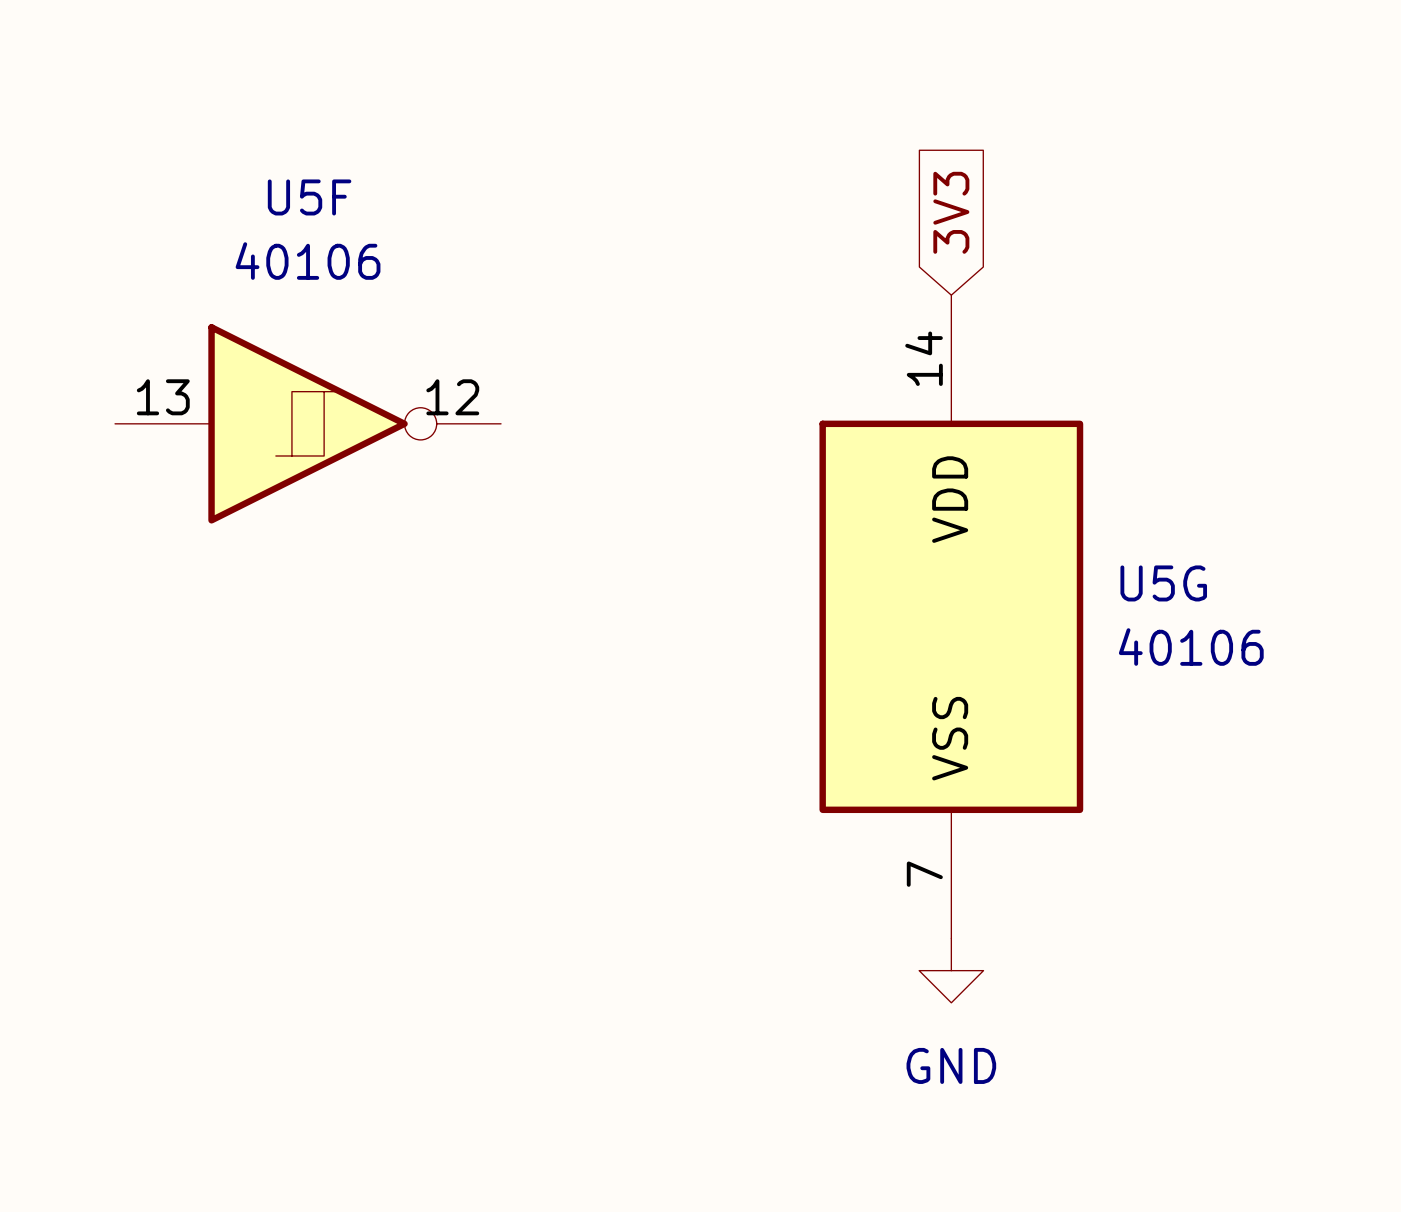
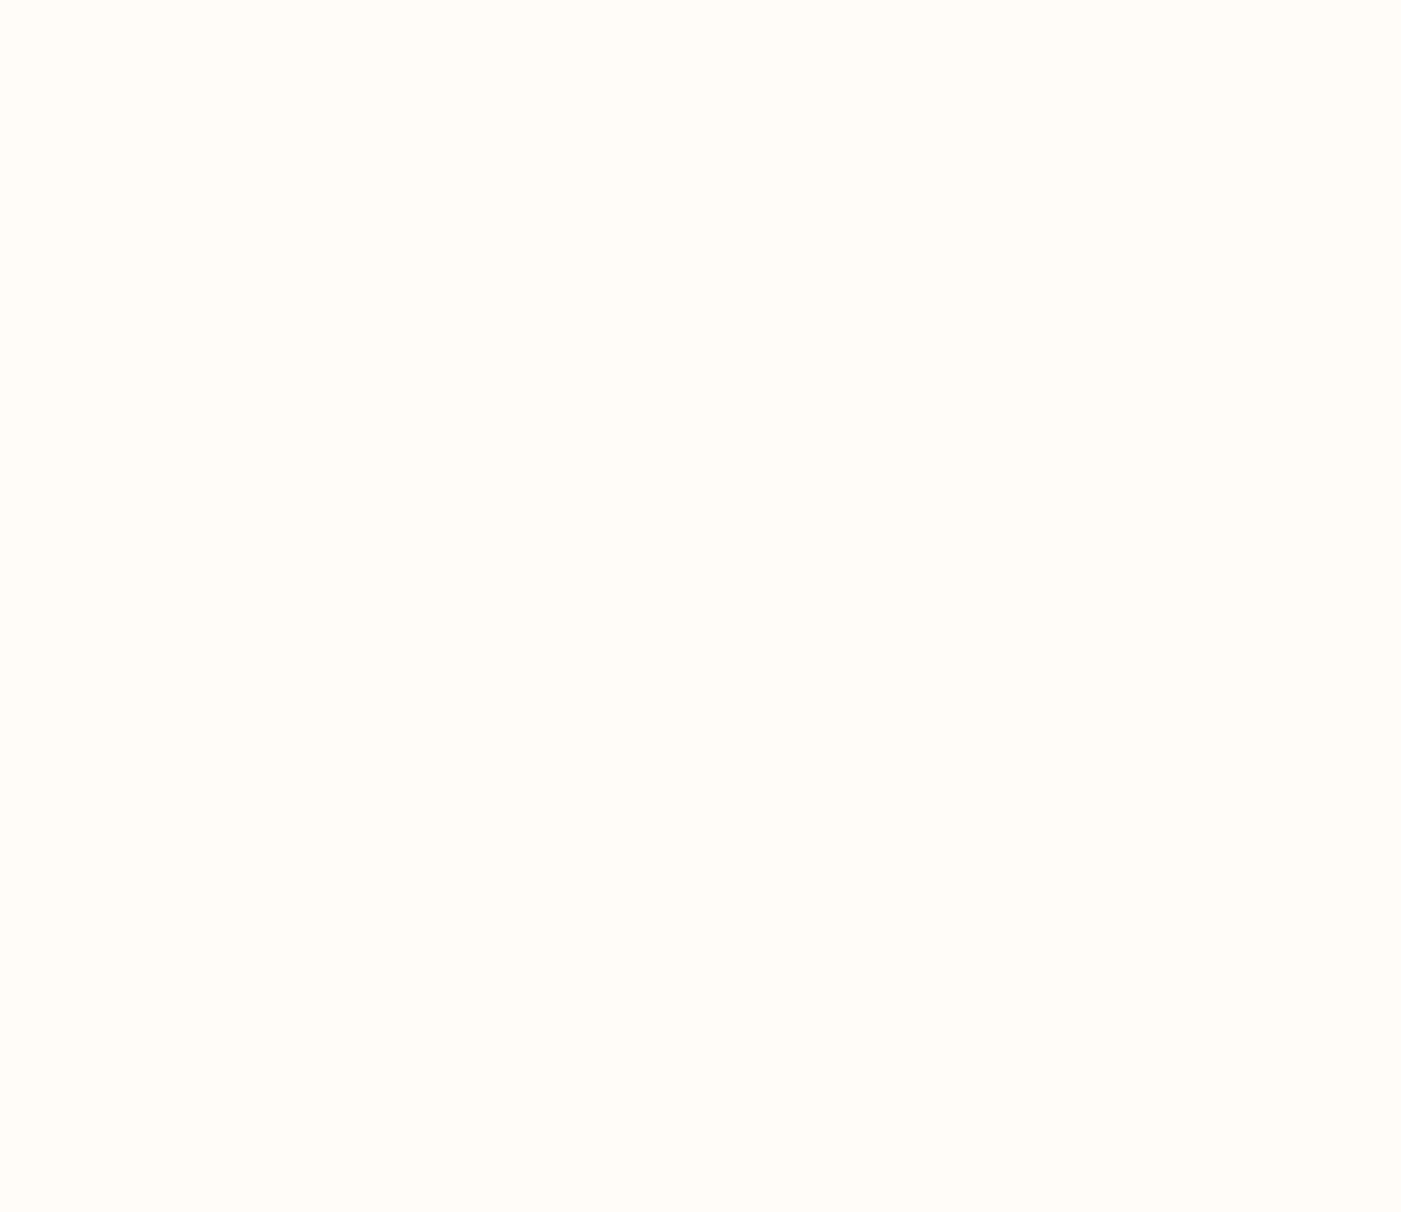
global label: 3V3 (951, 212) -> none
U5F: 40106 (308, 423) -> none
U5G: 40106 (951, 616) -> none
power symbol: GND (951, 970) -> none

